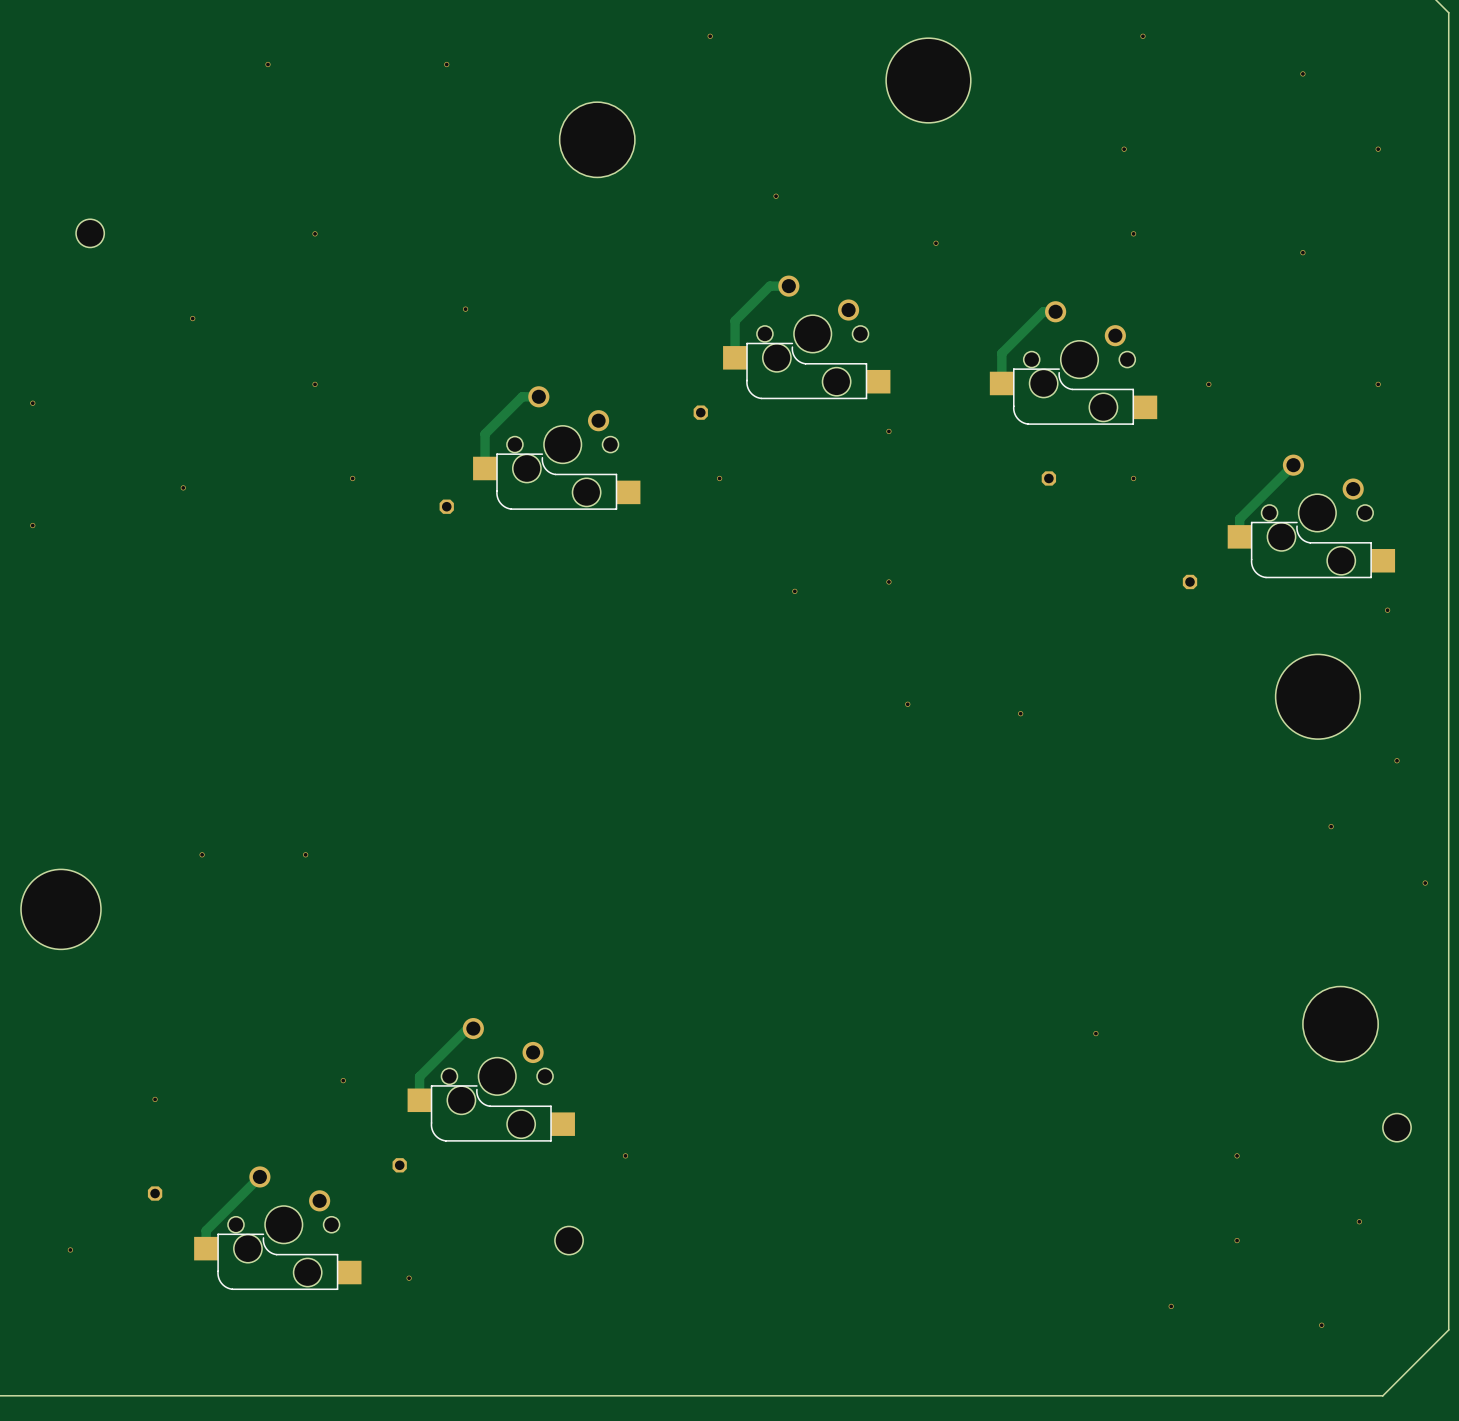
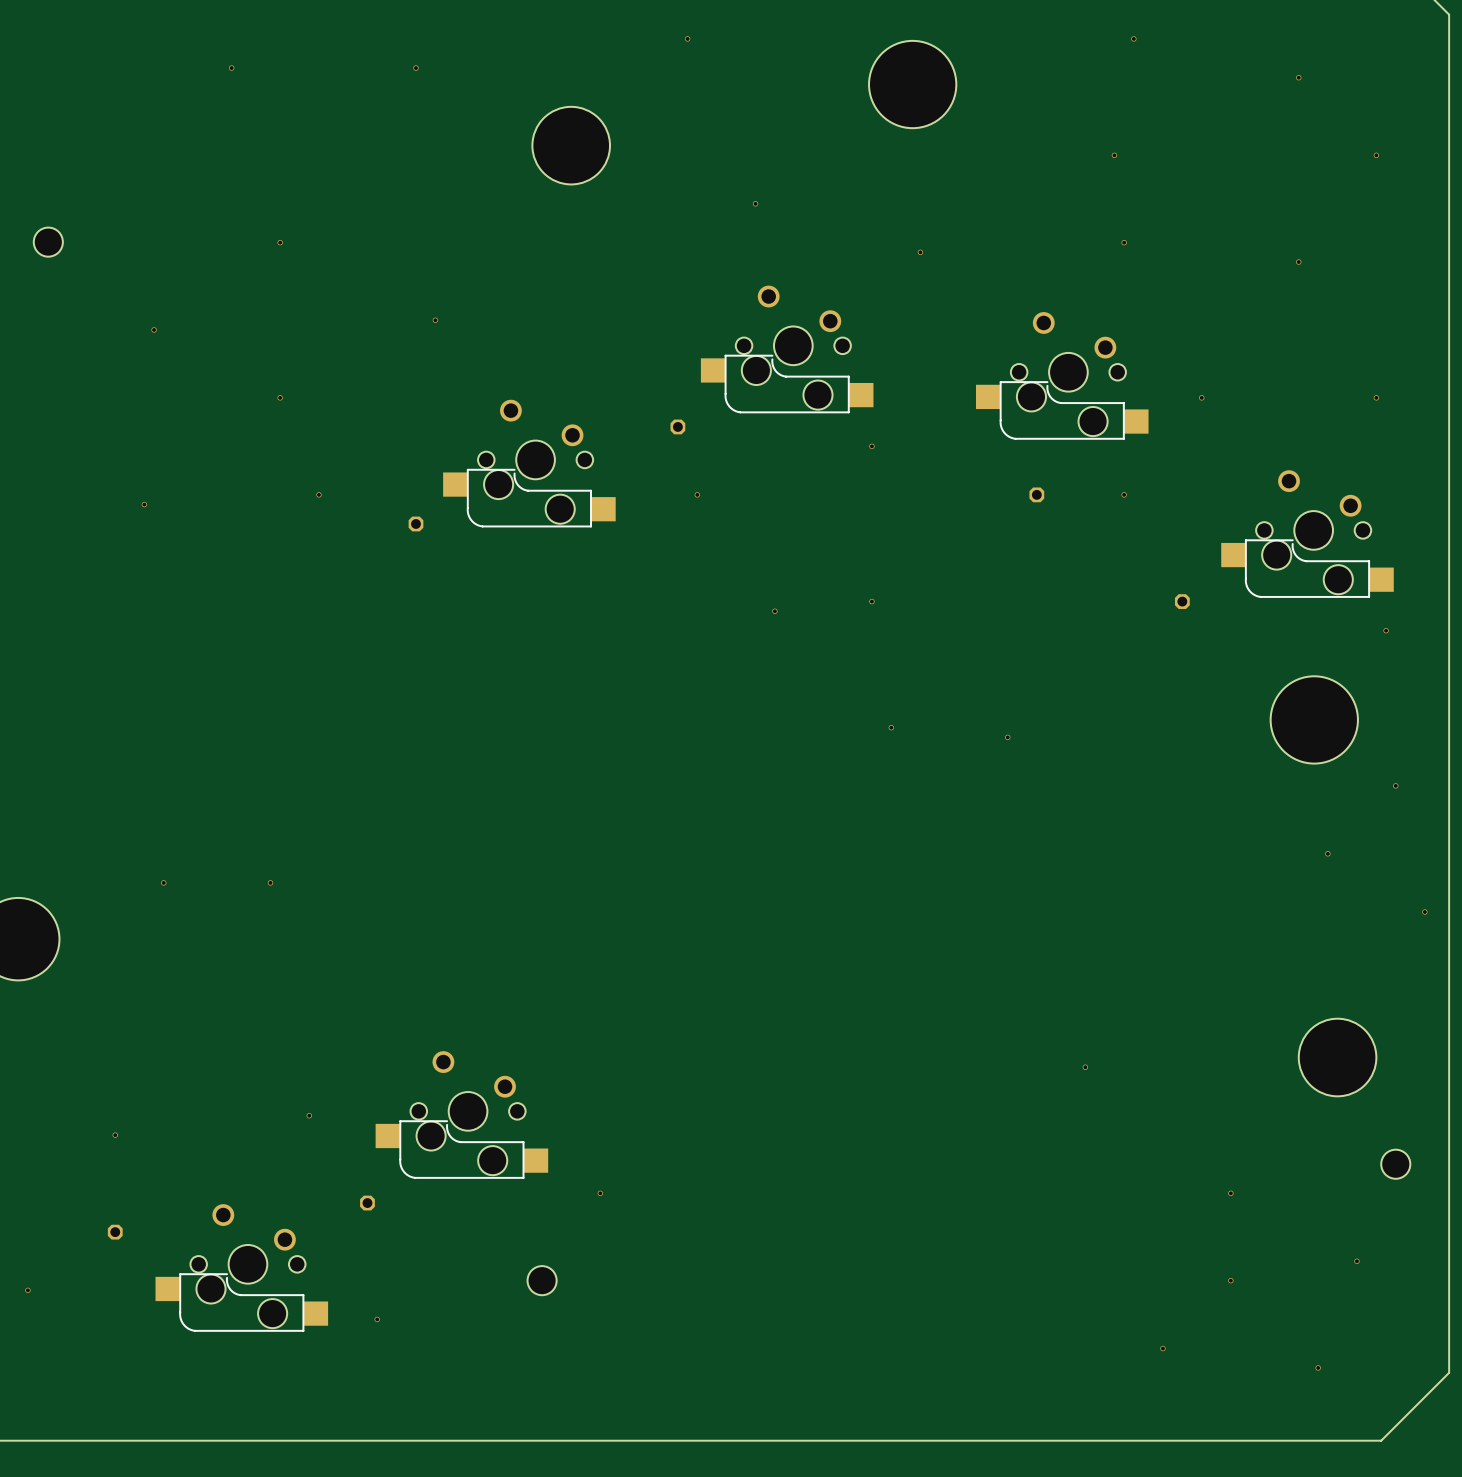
track: (788, 286) (769, 286) (735, 320) (735, 357) -> none
track: (1055, 311) (1043, 311) (1001, 353) (1001, 383) -> none
track: (538, 396) (522, 396) (485, 434) (485, 468) -> none
track: (1293, 465) (1239, 518) (1239, 536) -> none
track: (473, 1028) (467, 1028) (419, 1076) (419, 1100) -> none
track: (259, 1176) (206, 1230) (206, 1248) -> none

